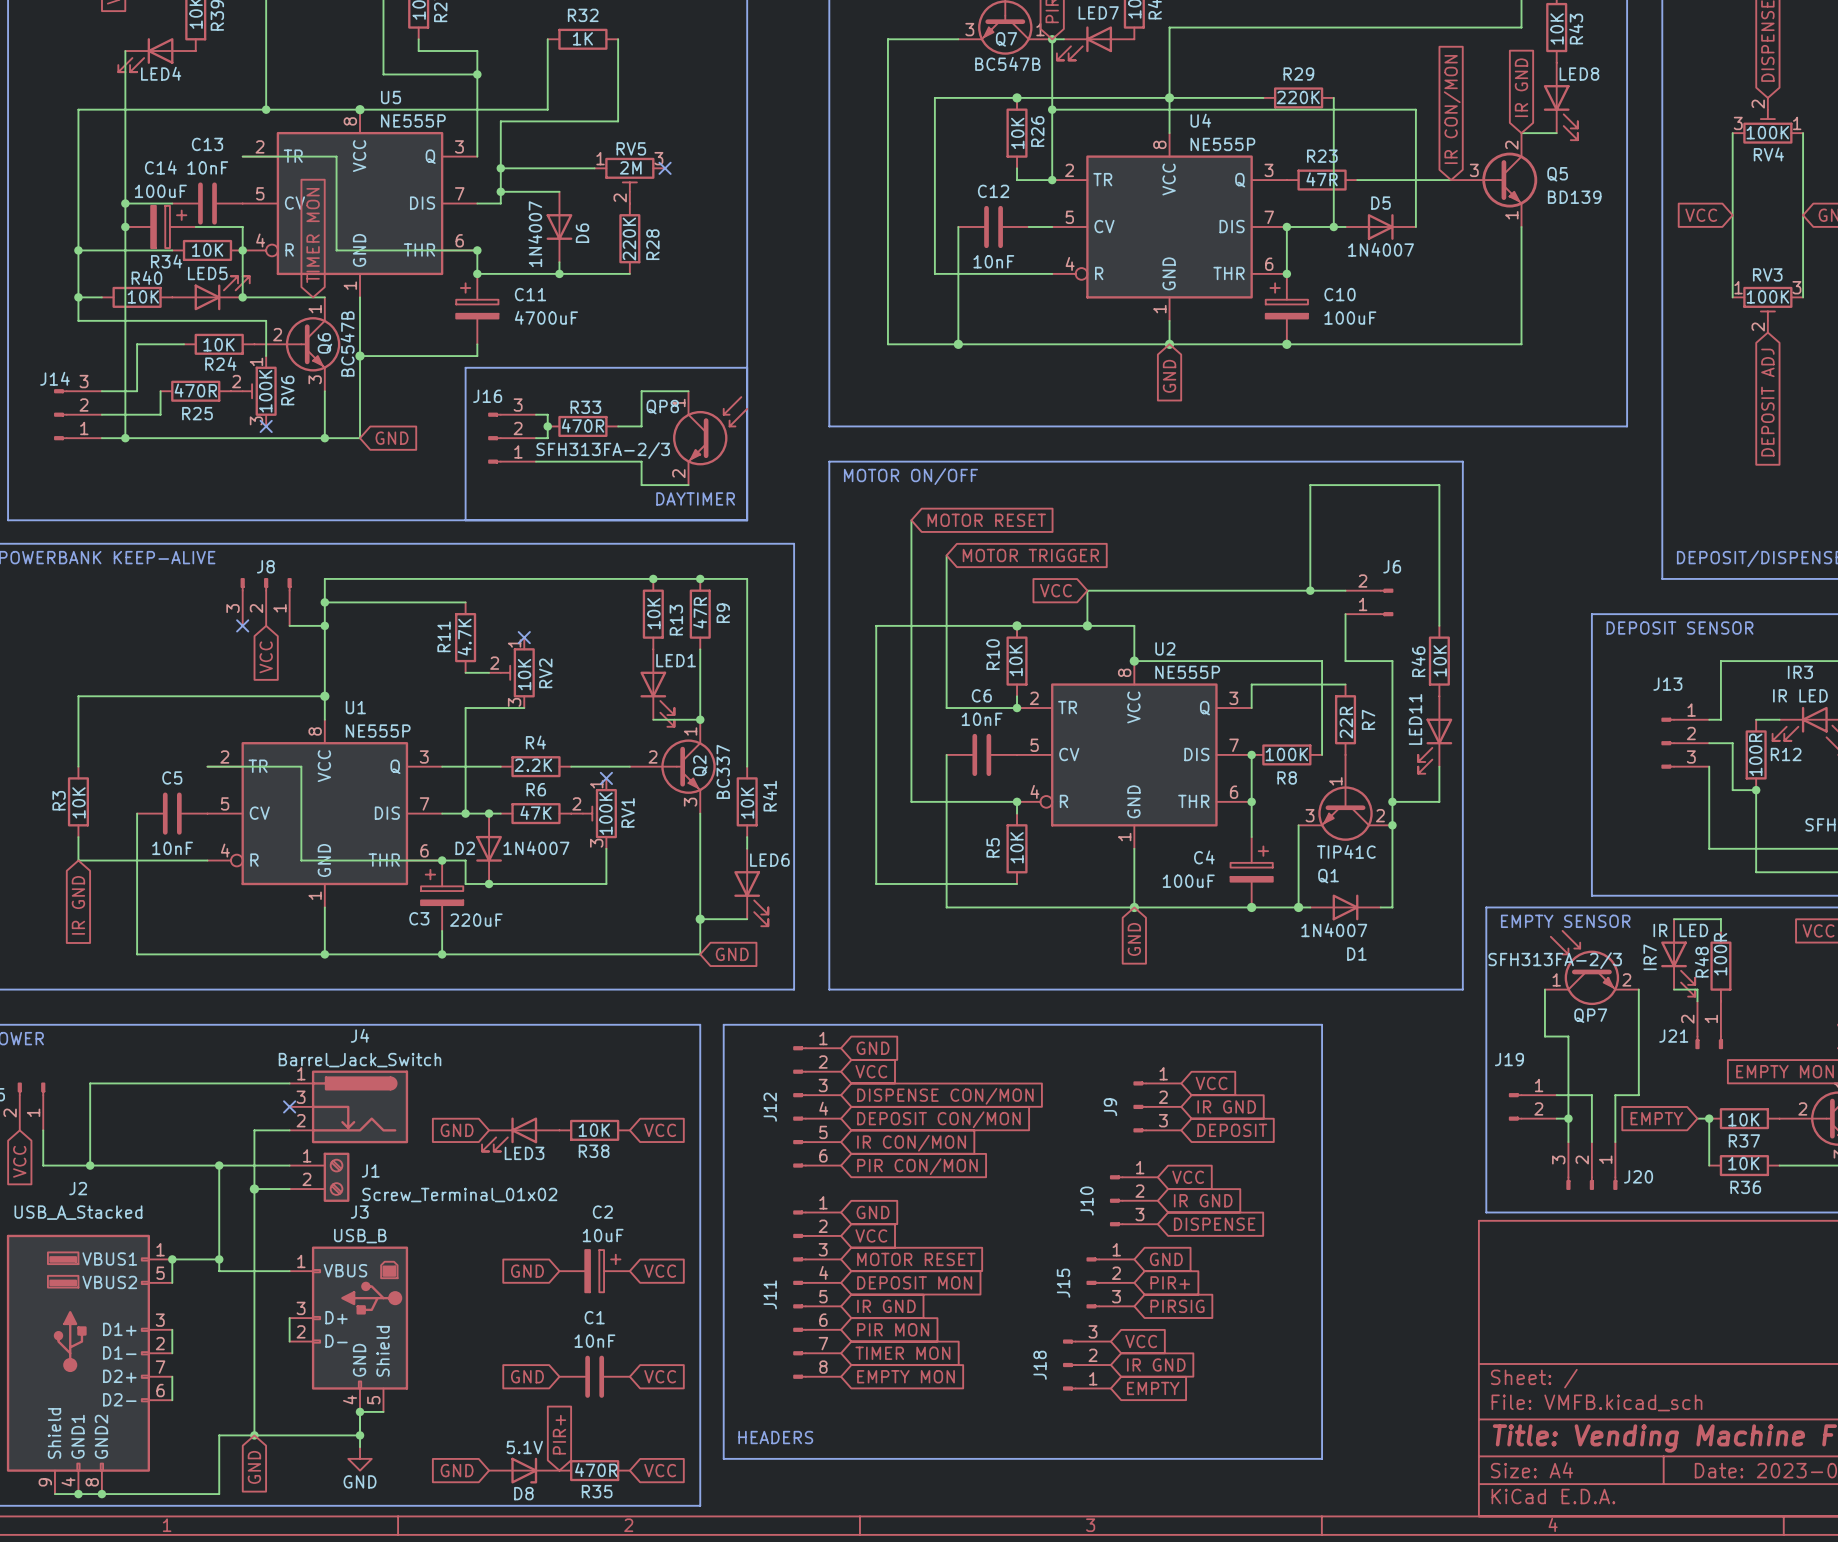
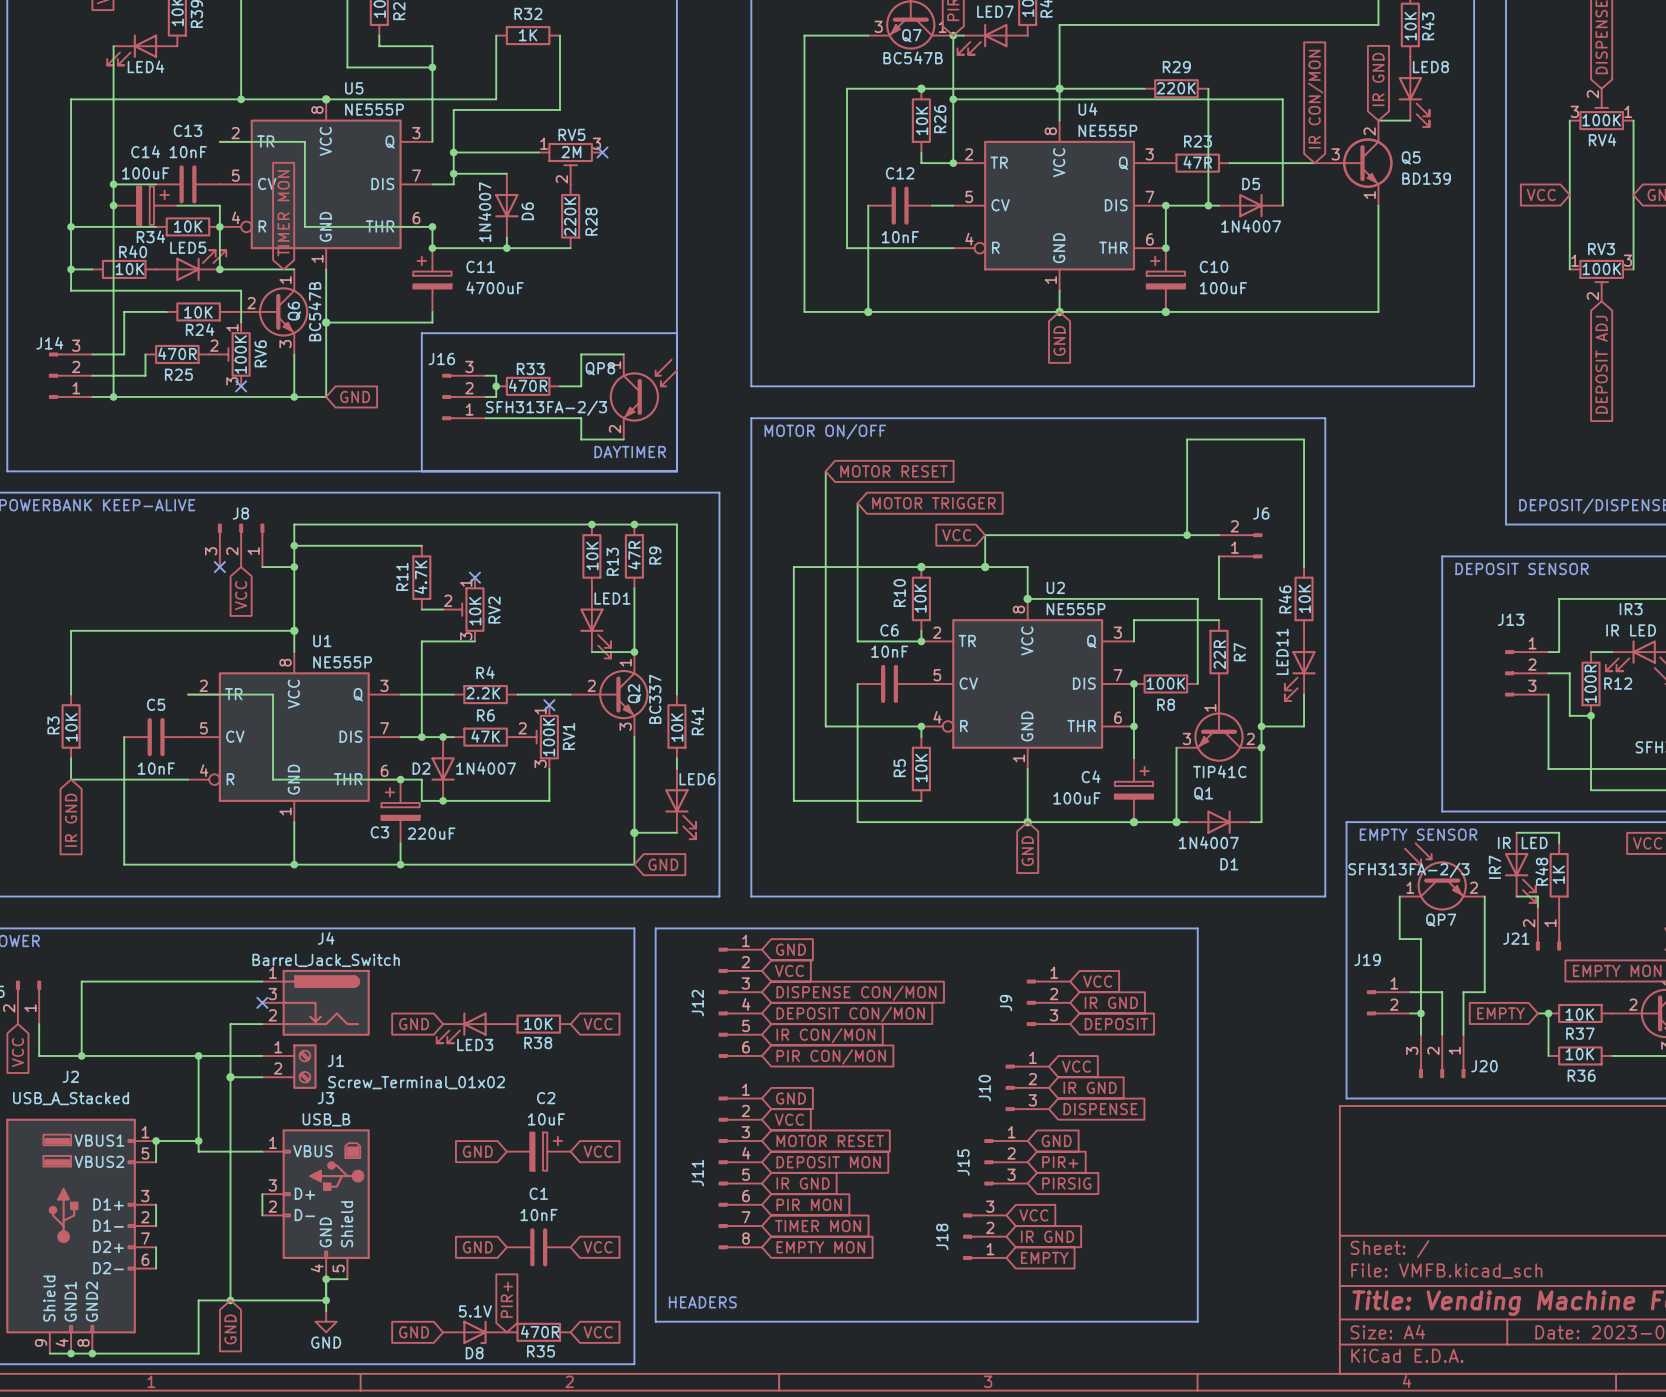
R48 value: 100R (1720, 954) -> 1K (1558, 874)

